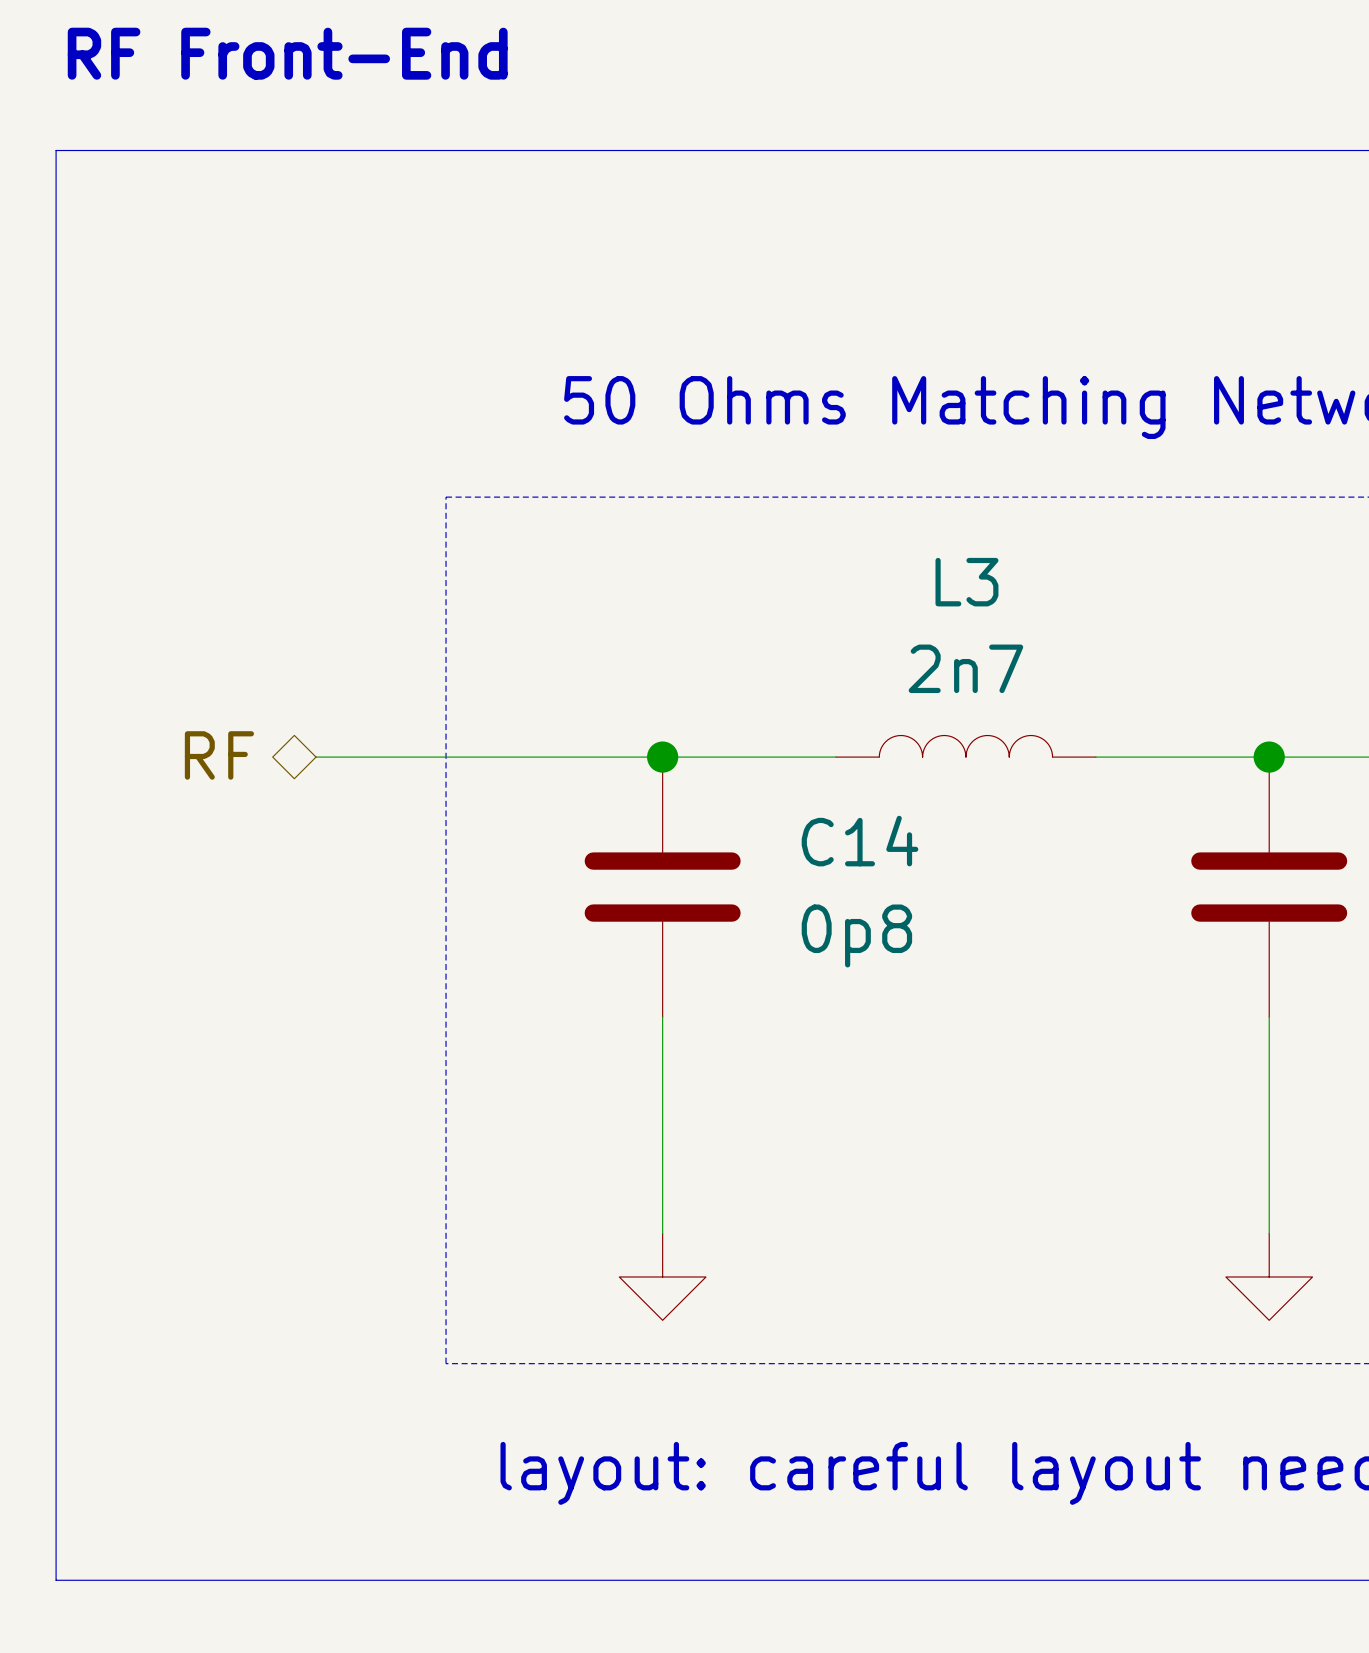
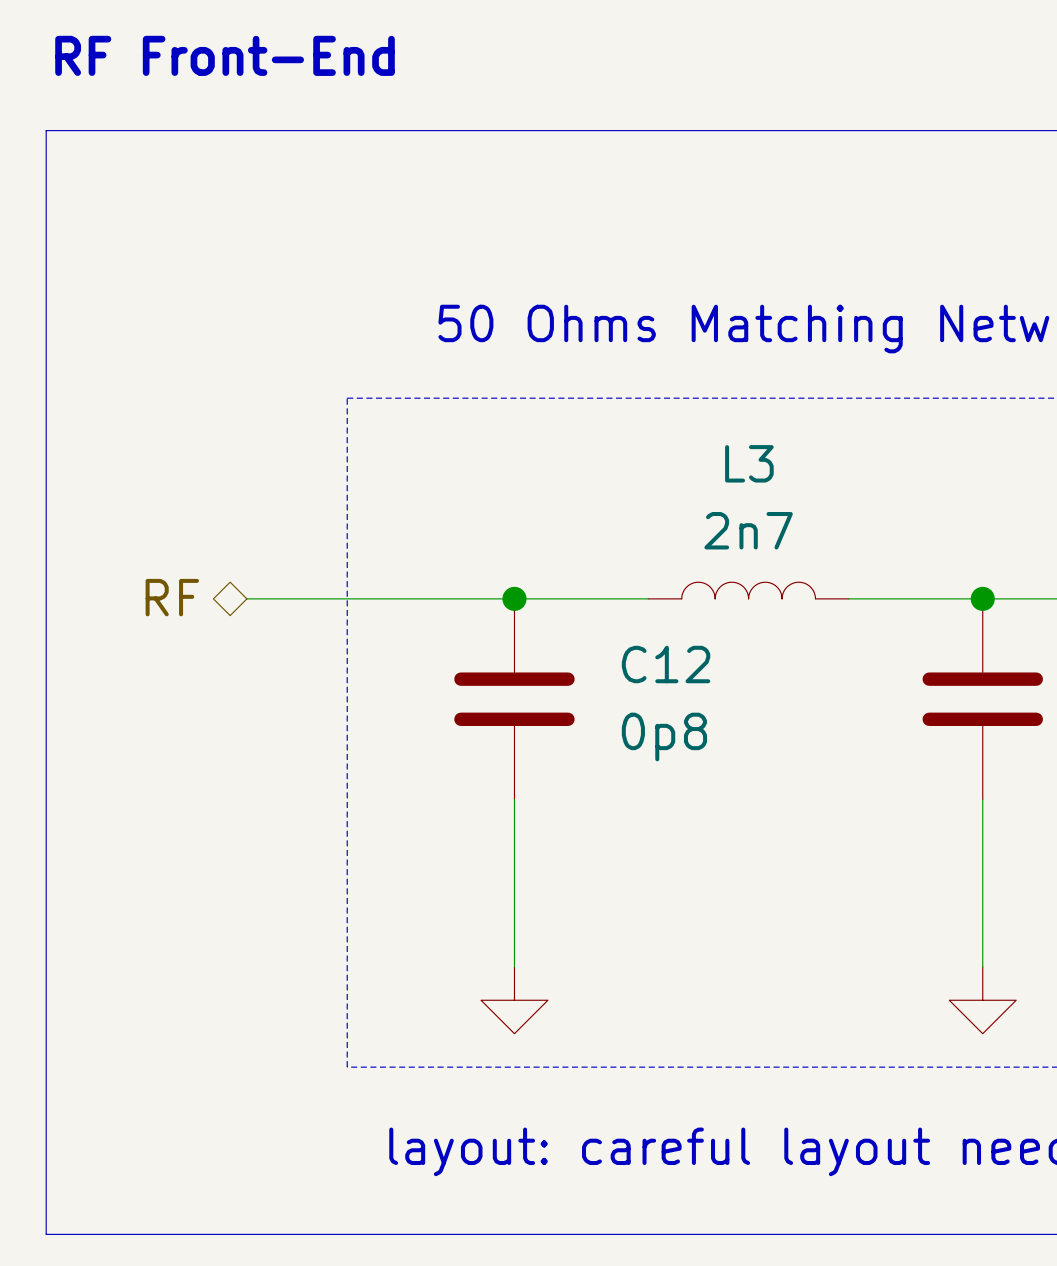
C14 name: C14 (860, 841) -> C12 (666, 664)

